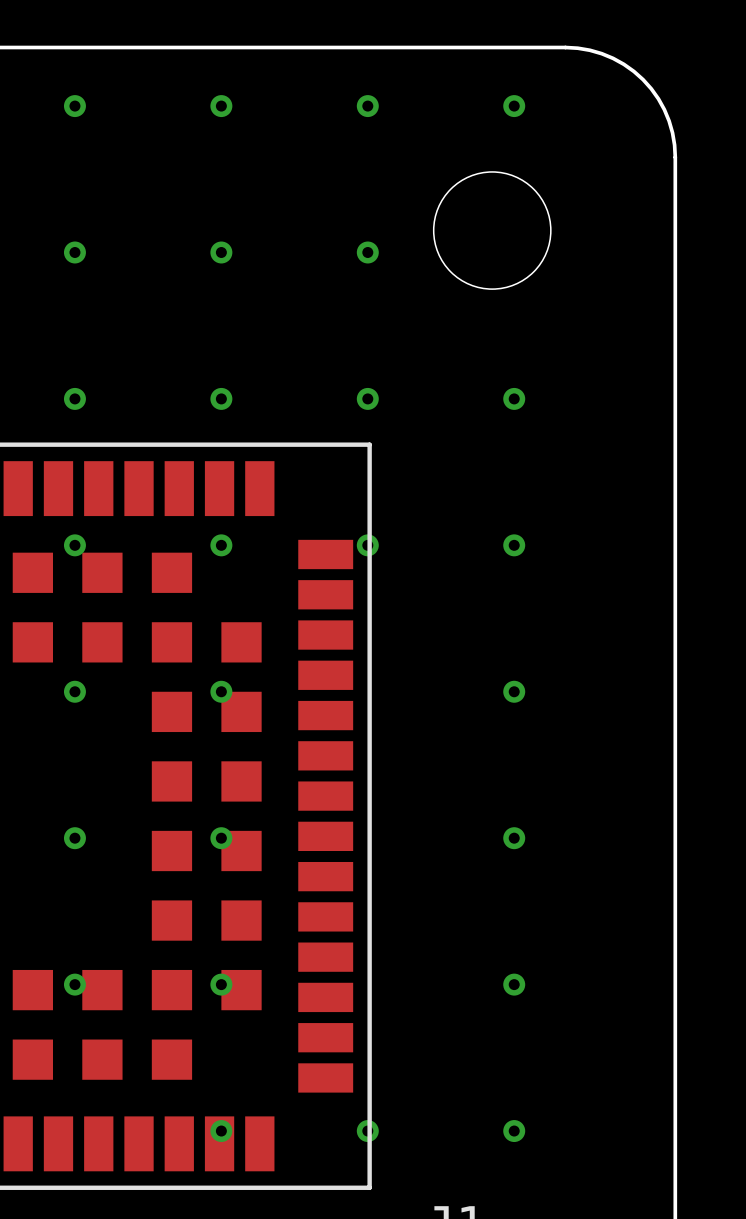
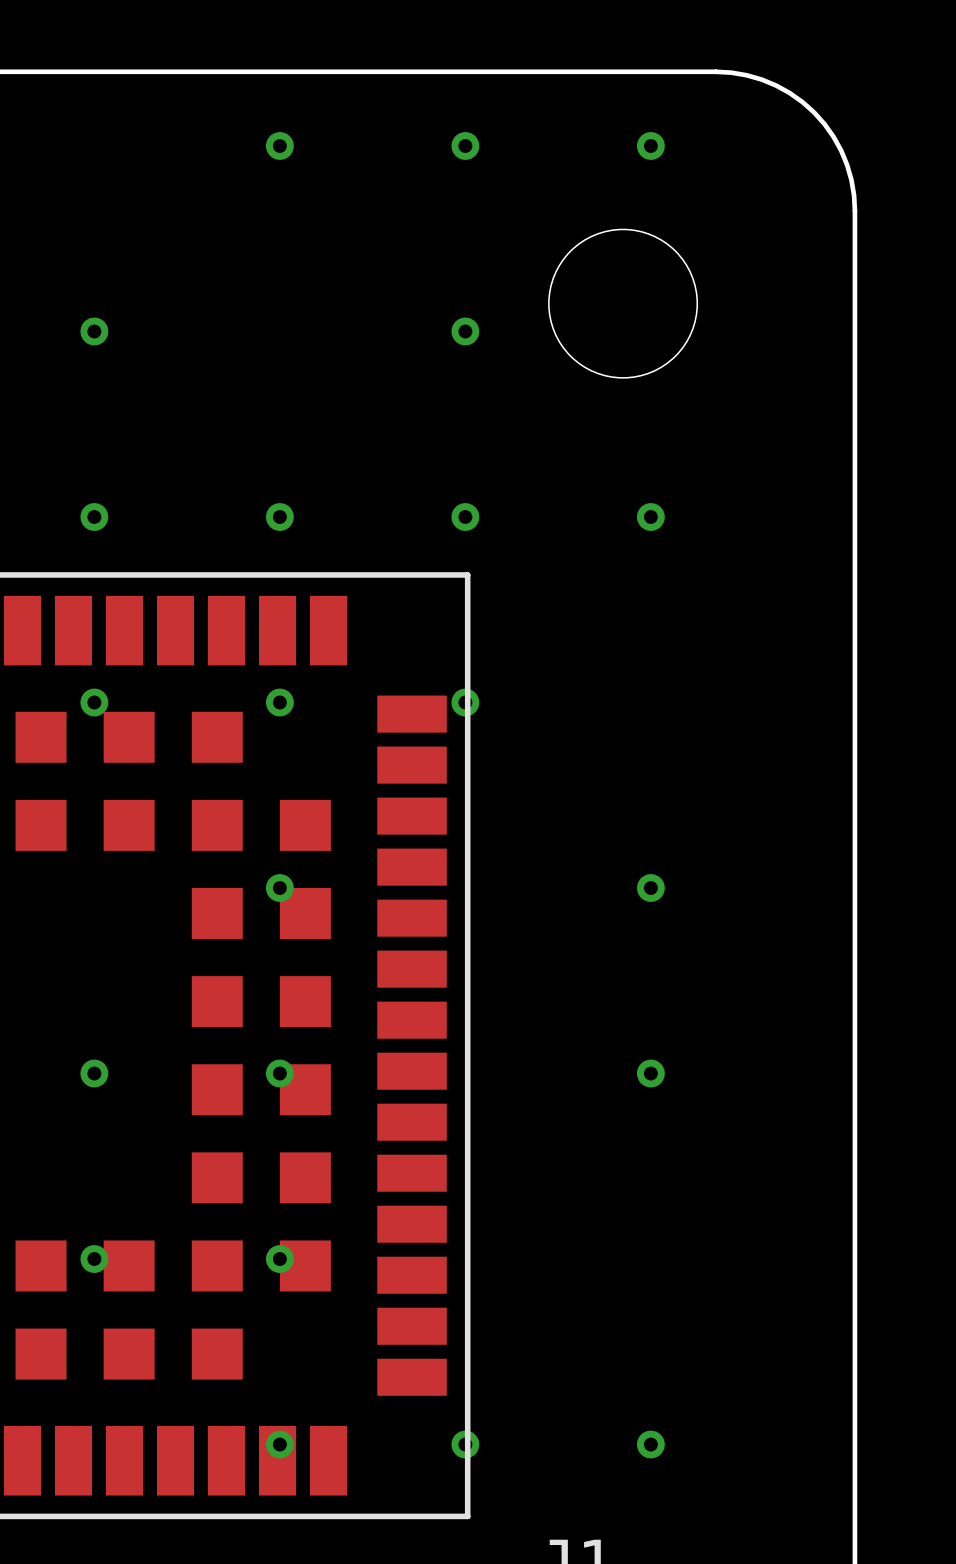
via: (74, 106) -> none
via: (221, 252) -> none
via: (514, 545) -> none
via: (74, 691) -> none
via: (514, 984) -> none

